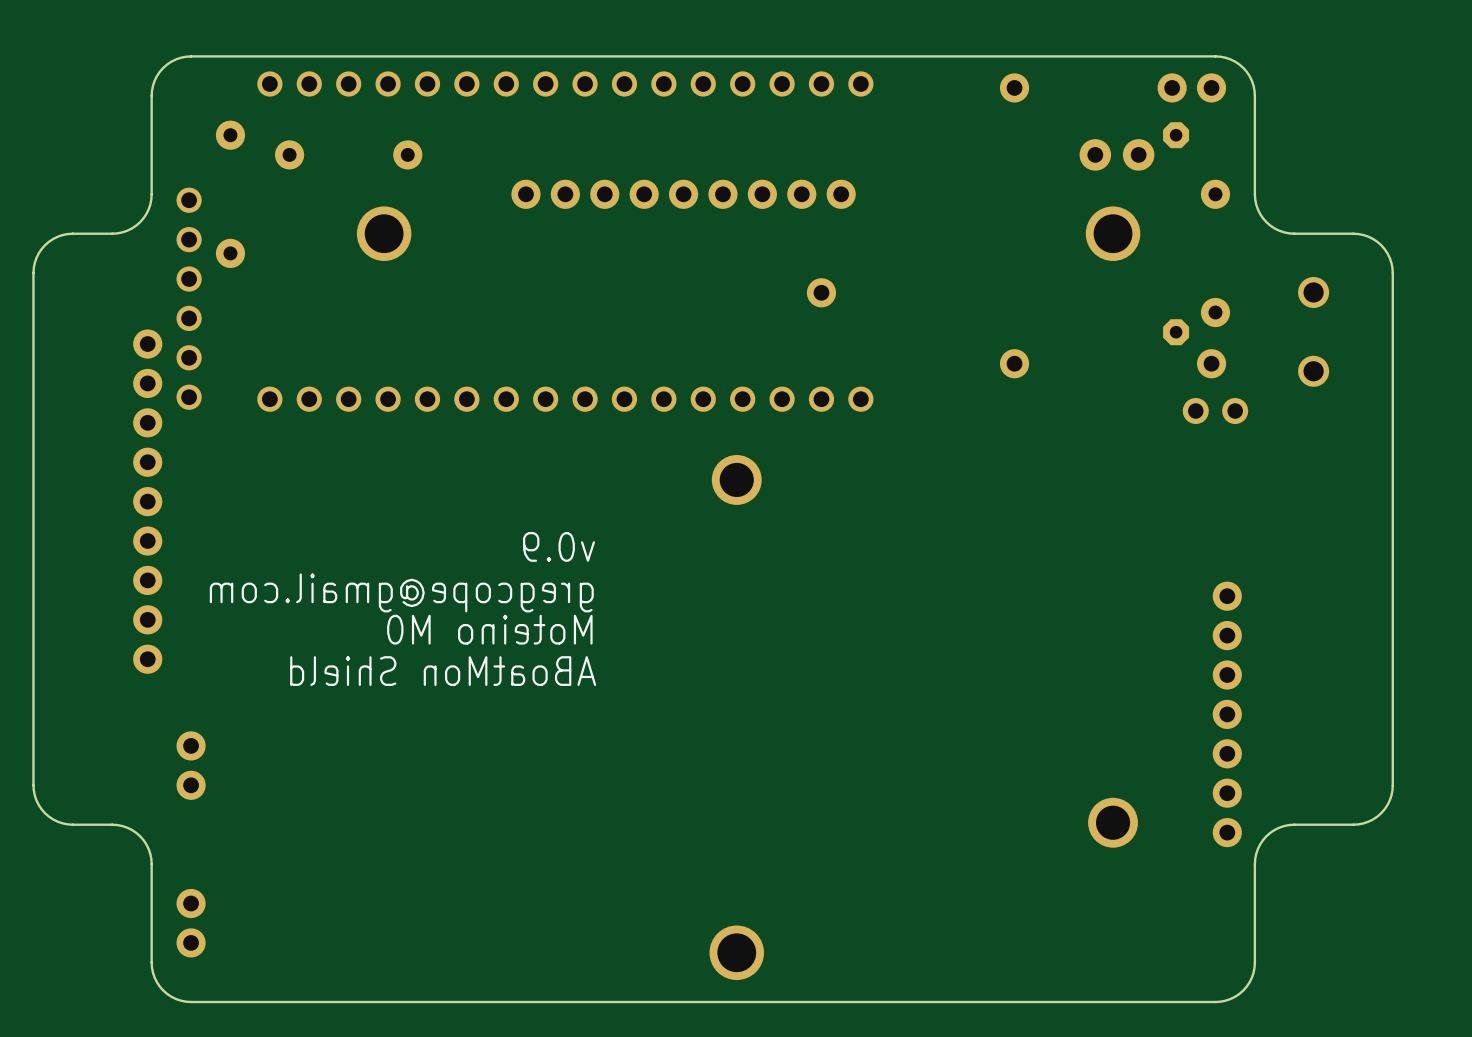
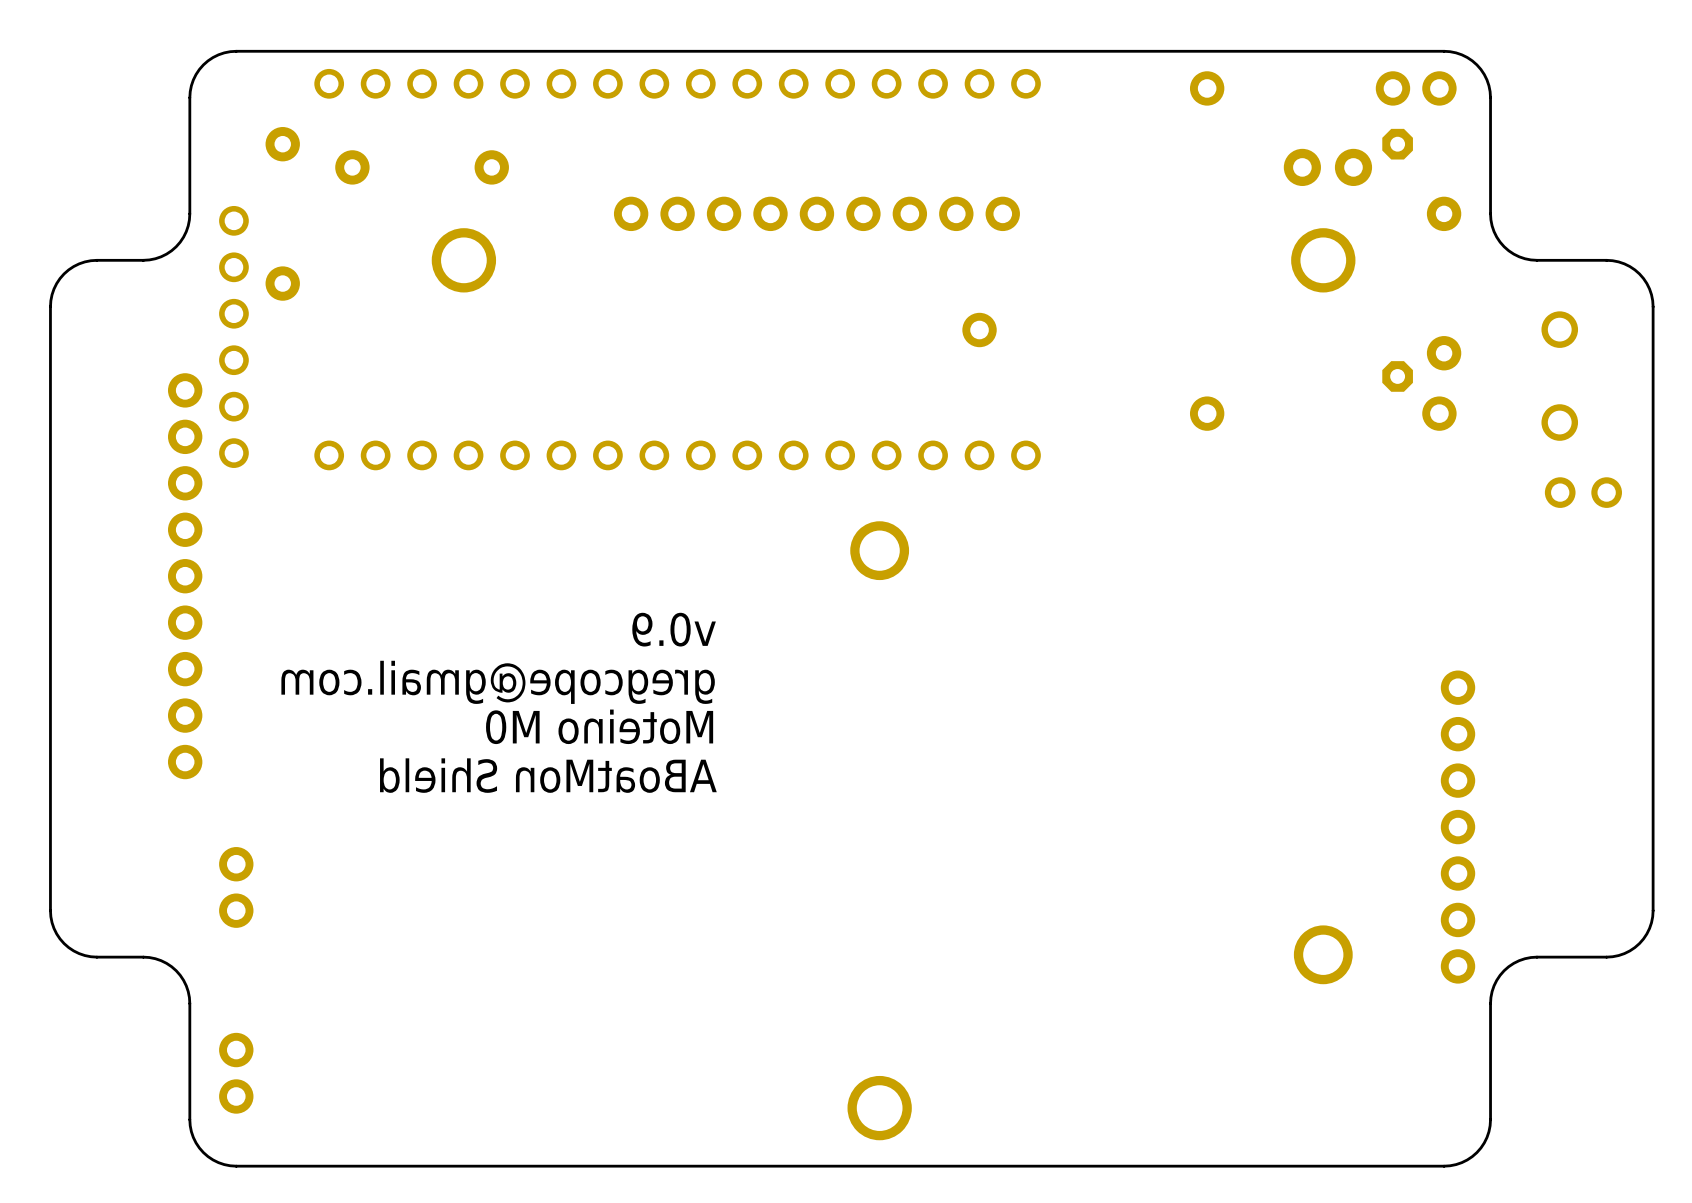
part position: (1215, 411) -> (1583, 492)

